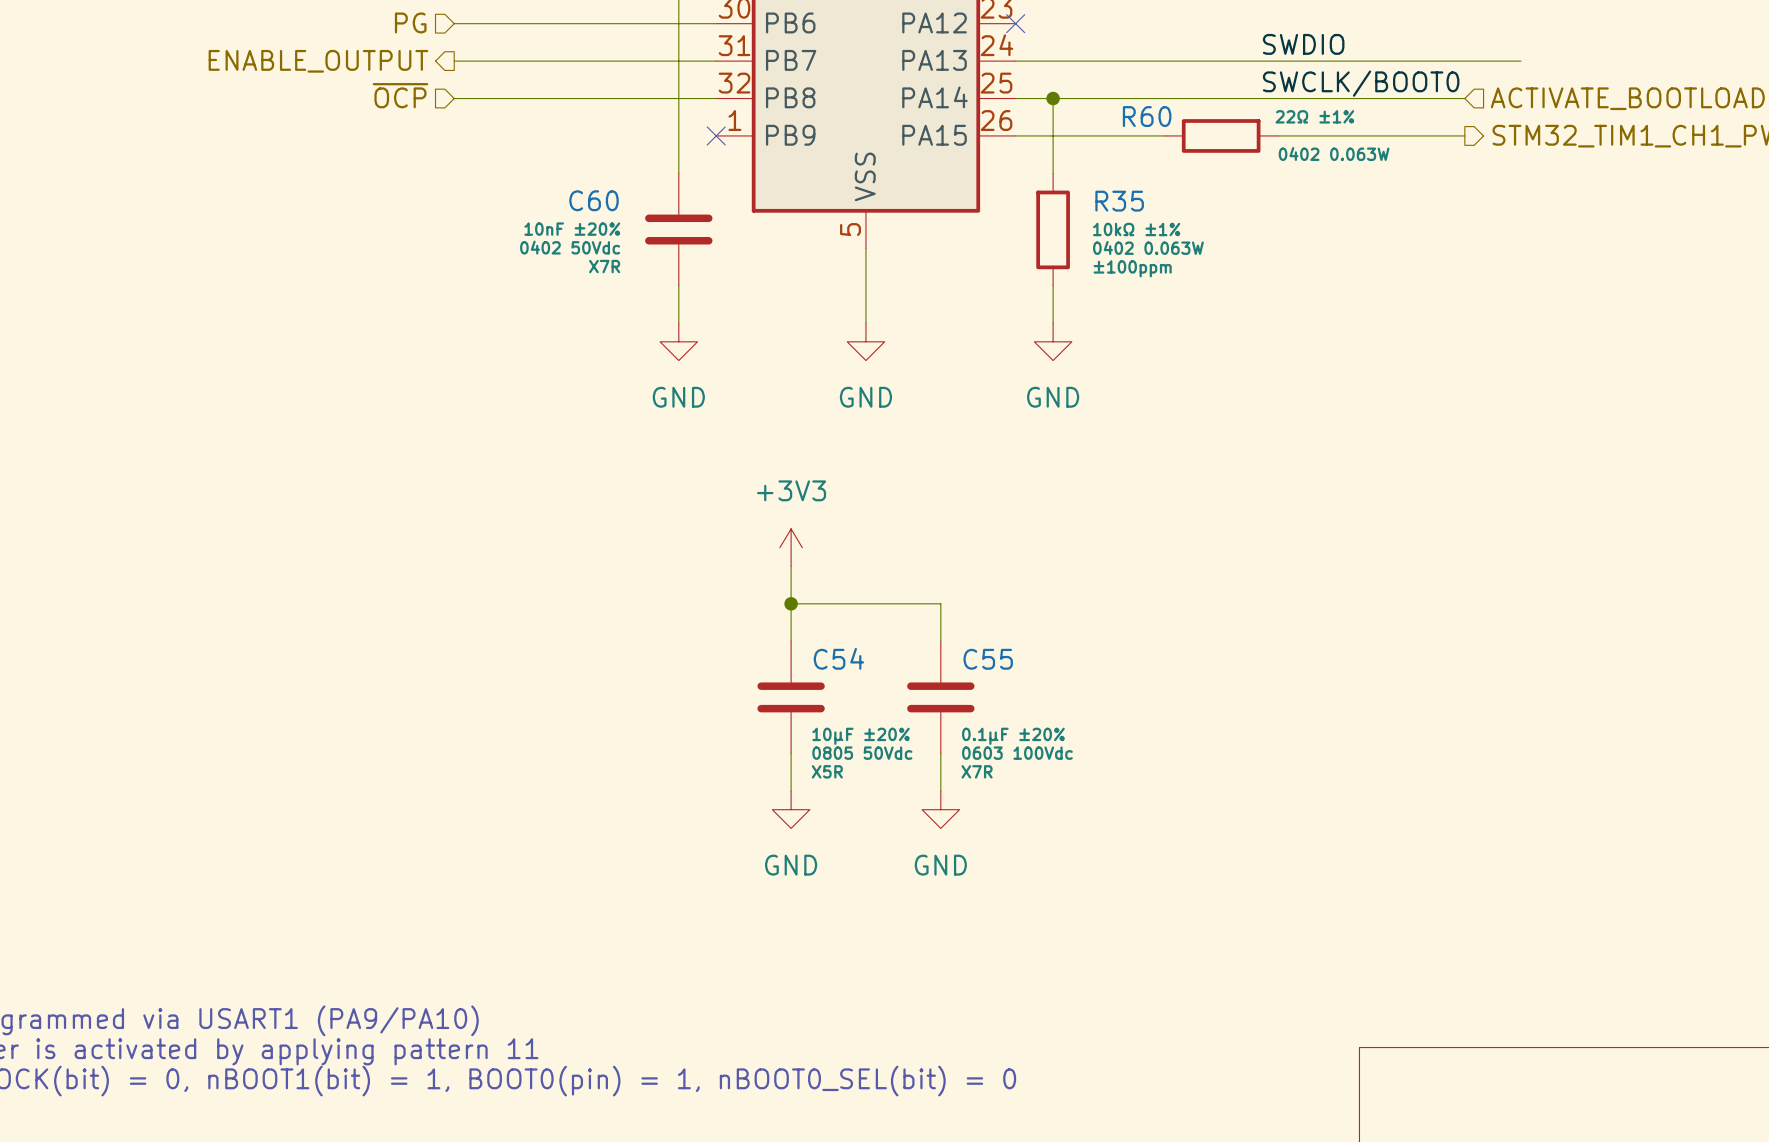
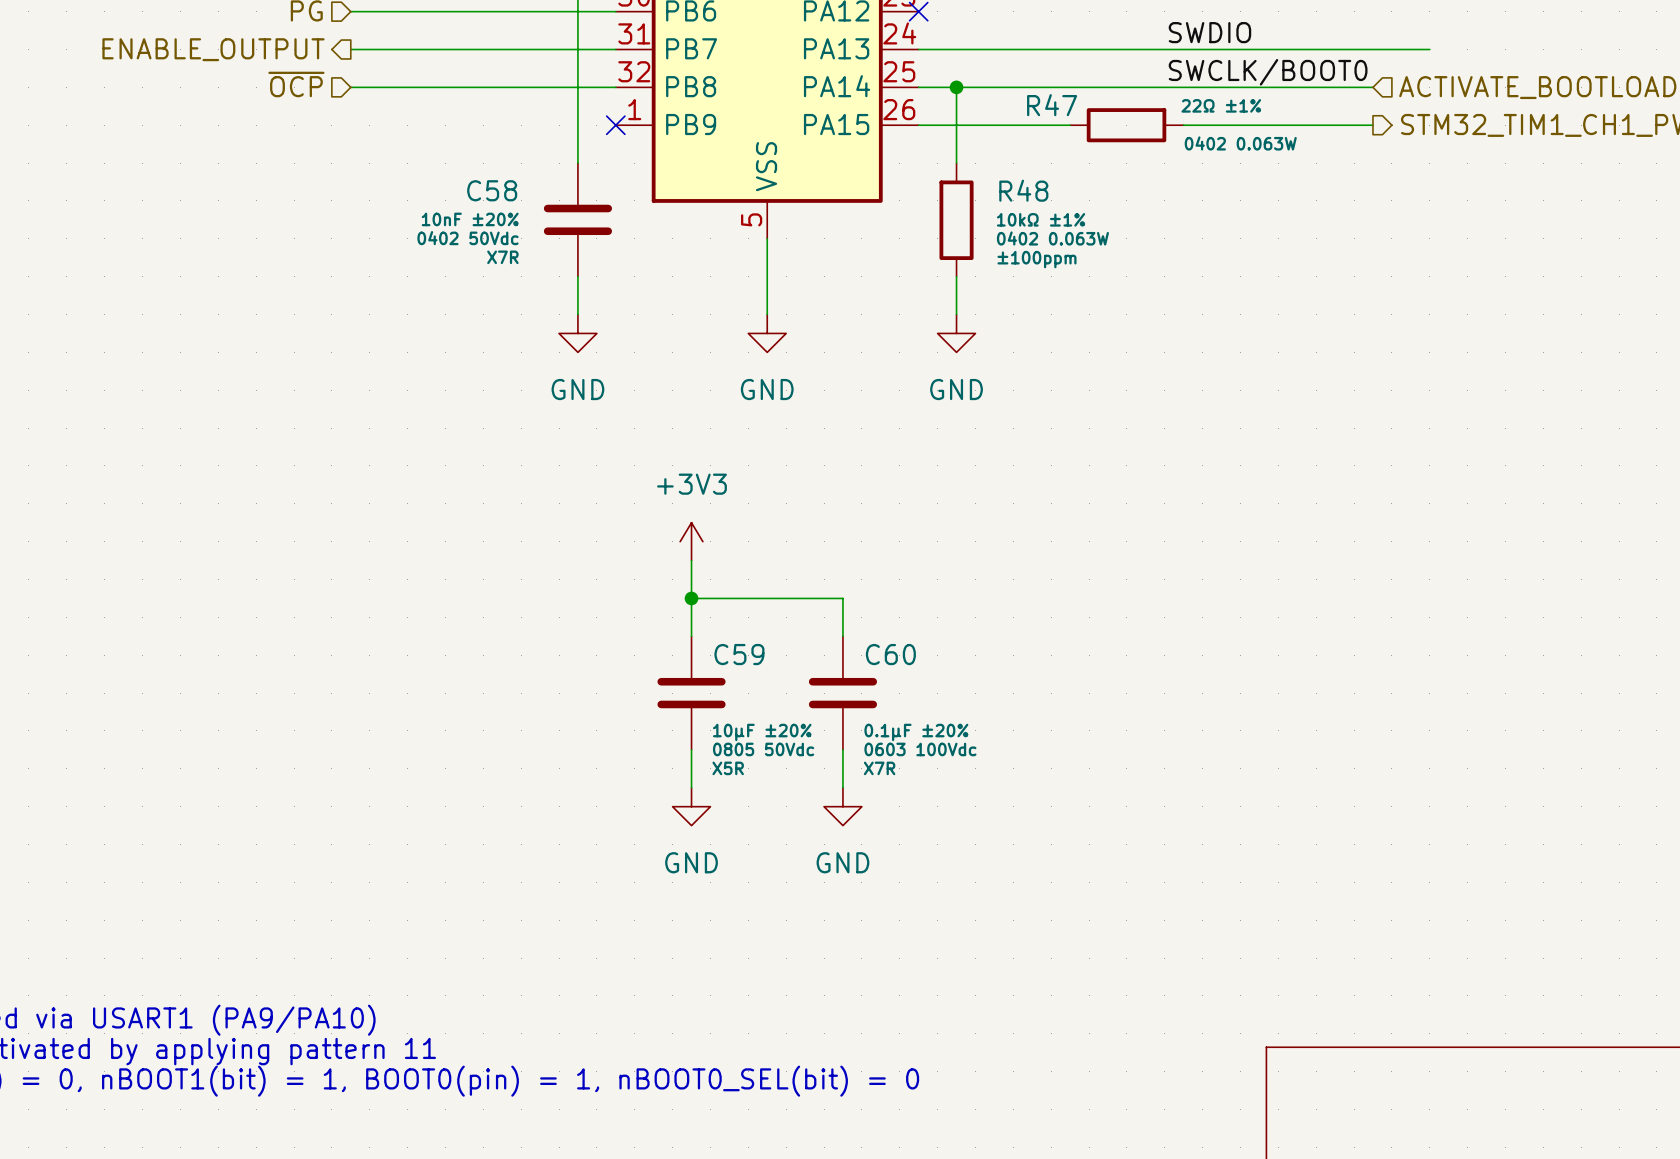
R60 name: R60 (1147, 116) -> R47 (1052, 105)
C60 name: C60 (594, 200) -> C58 (492, 190)
R35 name: R35 (1119, 201) -> R48 (1023, 190)
C54 name: C54 (838, 658) -> C59 (739, 654)
C55 name: C55 (988, 659) -> C60 (890, 654)

